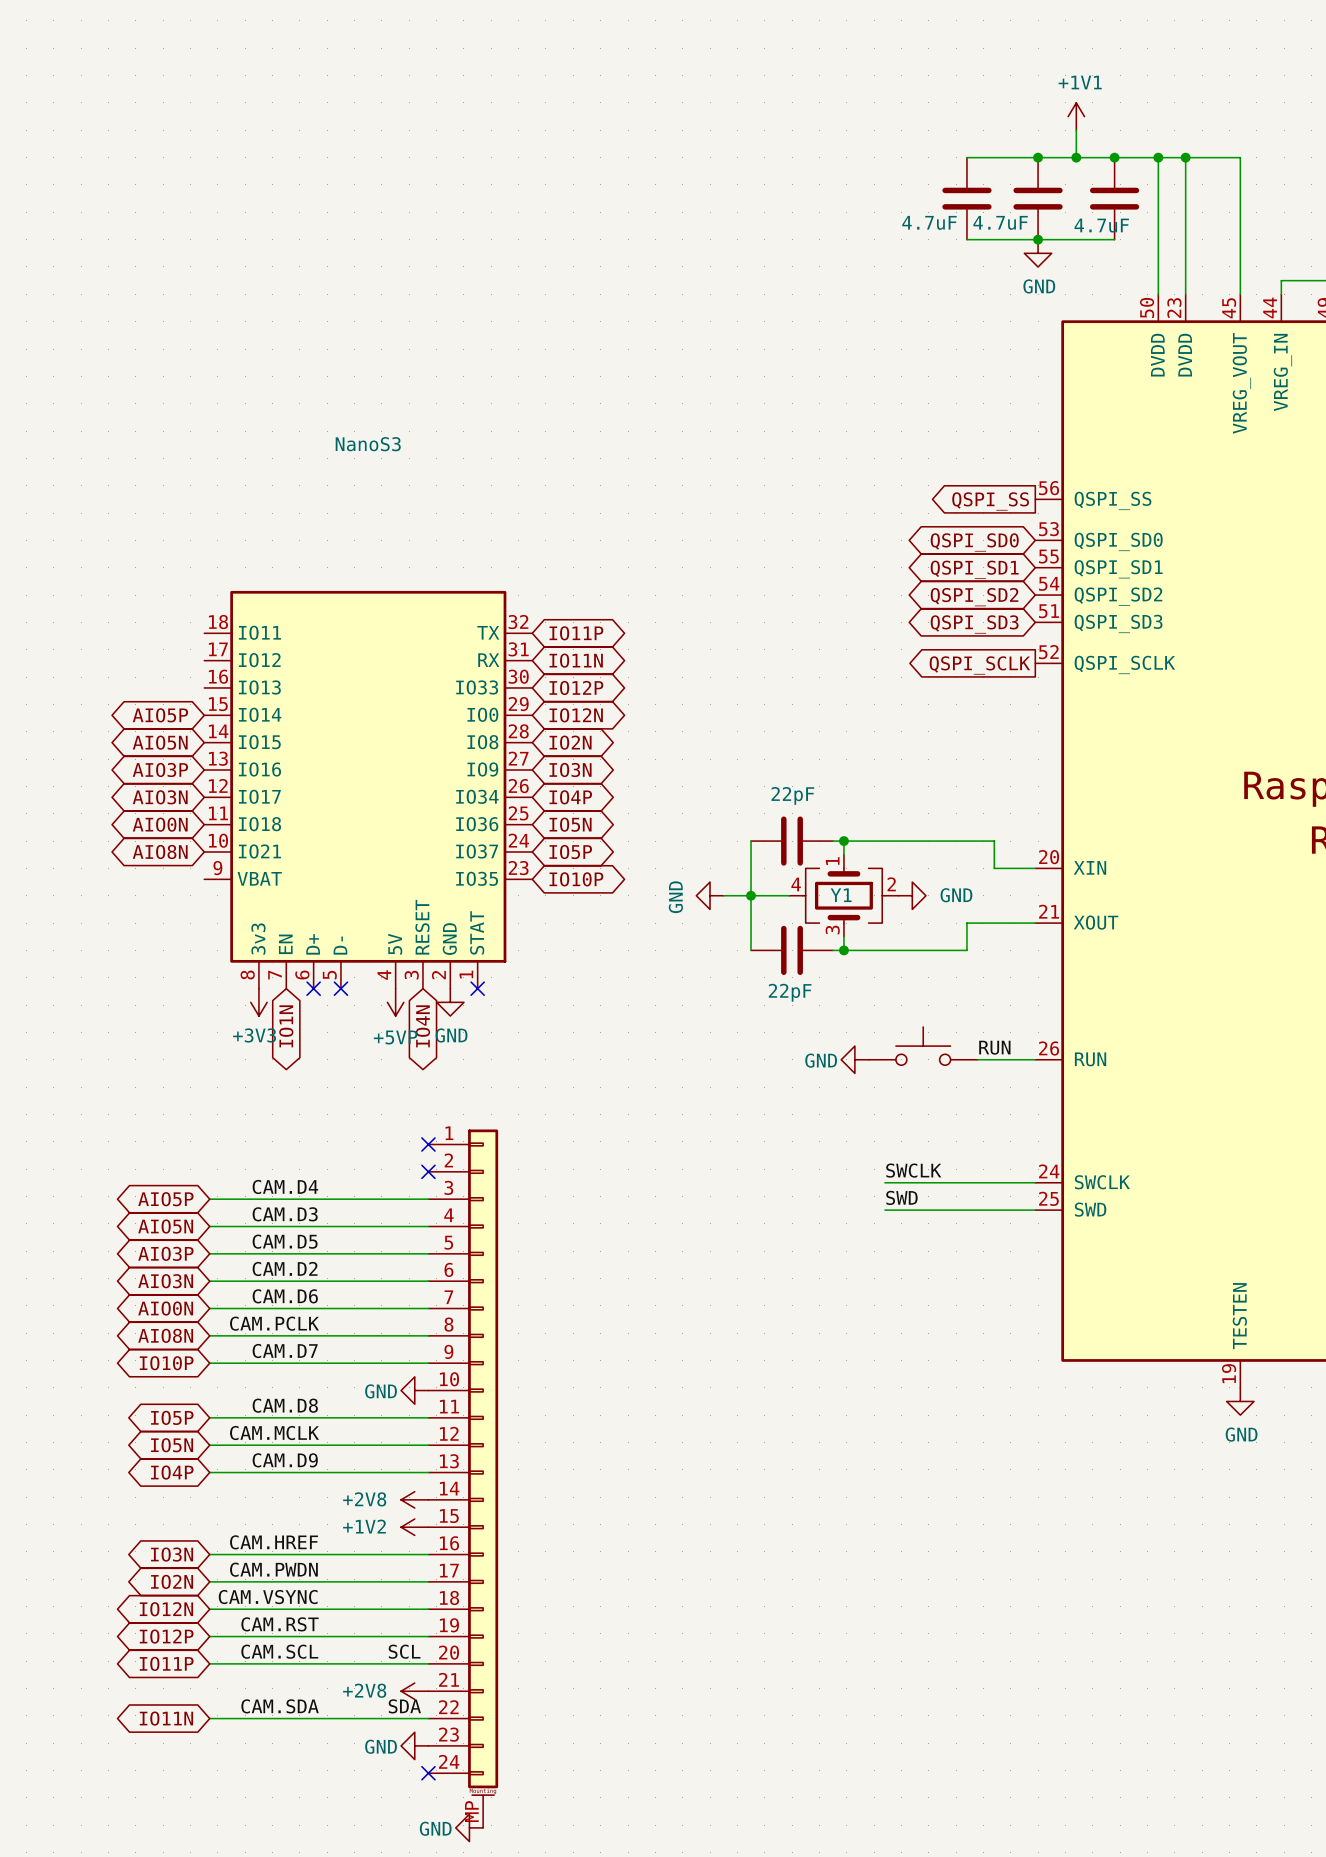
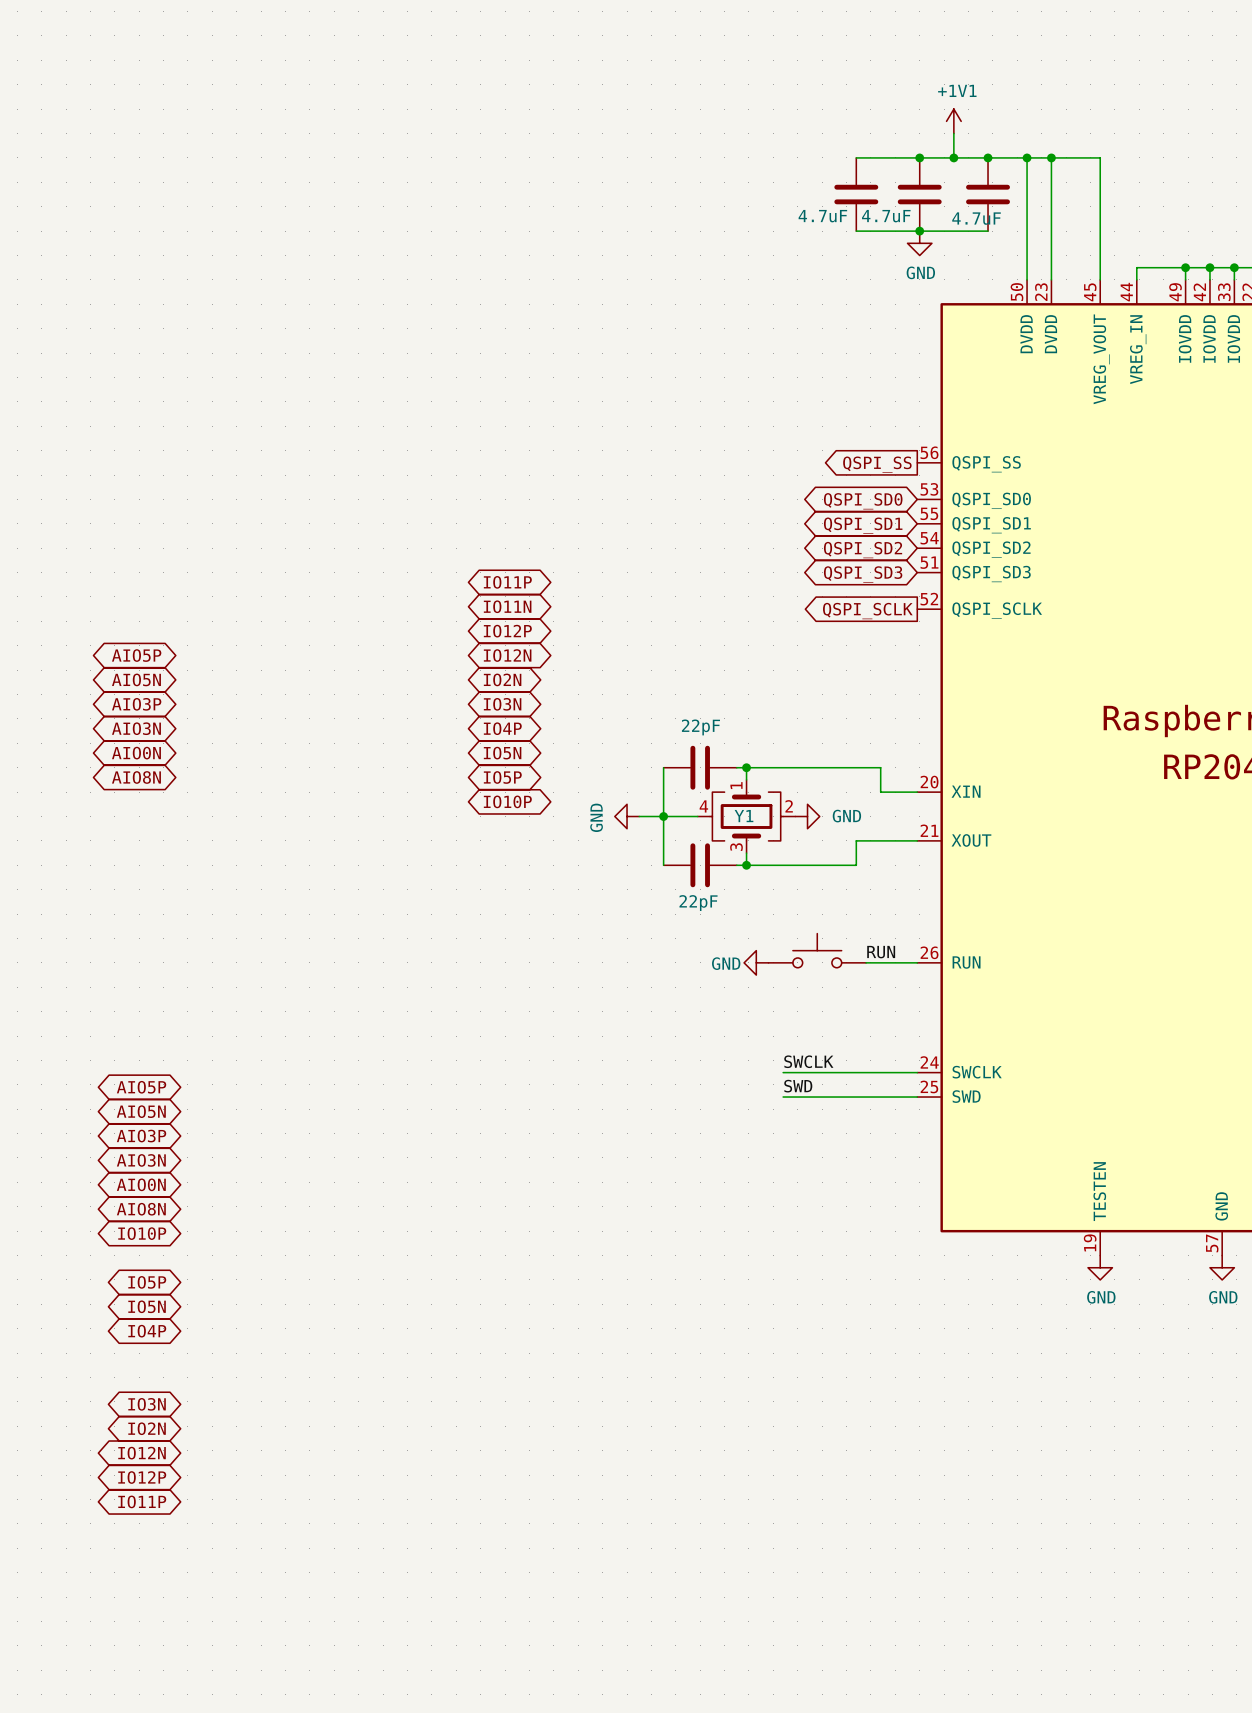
part: NanoS3 (368, 789) -> none
no-connect mark: (313, 988) -> none
no-connect mark: (340, 988) -> none
no-connect mark: (477, 988) -> none
power symbol: +3V3 (258, 1002) -> none
power symbol: +5VP (395, 1002) -> none
power symbol: GND (450, 1002) -> none
global label: IO1N (286, 1026) -> none
global label: IO4N (422, 1026) -> none
no-connect mark: (428, 1144) -> none
no-connect mark: (428, 1171) -> none
label: CAM.D4 (285, 1186) -> none
wire: (209, 1199) (428, 1199) -> none
label: CAM.D3 (285, 1214) -> none
wire: (209, 1226) (428, 1226) -> none
label: CAM.D5 (285, 1241) -> none
wire: (209, 1253) (428, 1253) -> none
label: CAM.D2 (285, 1268) -> none
wire: (209, 1281) (428, 1281) -> none
label: CAM.D6 (285, 1296) -> none
wire: (209, 1308) (428, 1308) -> none
label: CAM.PCLK (274, 1323) -> none
wire: (209, 1335) (428, 1335) -> none
label: CAM.D7 (285, 1351) -> none
wire: (209, 1363) (428, 1363) -> none
power symbol: GND (414, 1390) -> none
label: CAM.D8 (285, 1405) -> none
wire: (209, 1417) (428, 1417) -> none
label: CAM.MCLK (274, 1433) -> none
wire: (209, 1445) (428, 1445) -> none
label: CAM.D9 (285, 1460) -> none
wire: (209, 1472) (428, 1472) -> none
part: (463, 1478) -> none
power symbol: +2V8 (414, 1499) -> none
power symbol: +1V2 (414, 1527) -> none
label: CAM.HREF (274, 1542) -> none
wire: (209, 1554) (428, 1554) -> none
label: CAM.PWDN (273, 1569) -> none
wire: (209, 1581) (428, 1581) -> none
label: CAM.VSYNC (268, 1597) -> none
wire: (209, 1609) (428, 1609) -> none
label: CAM.RST (280, 1624) -> none
wire: (209, 1636) (428, 1636) -> none
label: CAM.SCL (279, 1651) -> none
label: SCL (404, 1651) -> none
wire: (209, 1663) (428, 1663) -> none
power symbol: +2V8 (414, 1691) -> none
label: CAM.SDA (280, 1706) -> none
label: SDA (404, 1706) -> none
global label: IO11N (166, 1718) -> none
wire: (209, 1718) (428, 1718) -> none
power symbol: GND (414, 1745) -> none
no-connect mark: (428, 1773) -> none
power symbol: GND (469, 1827) -> none

